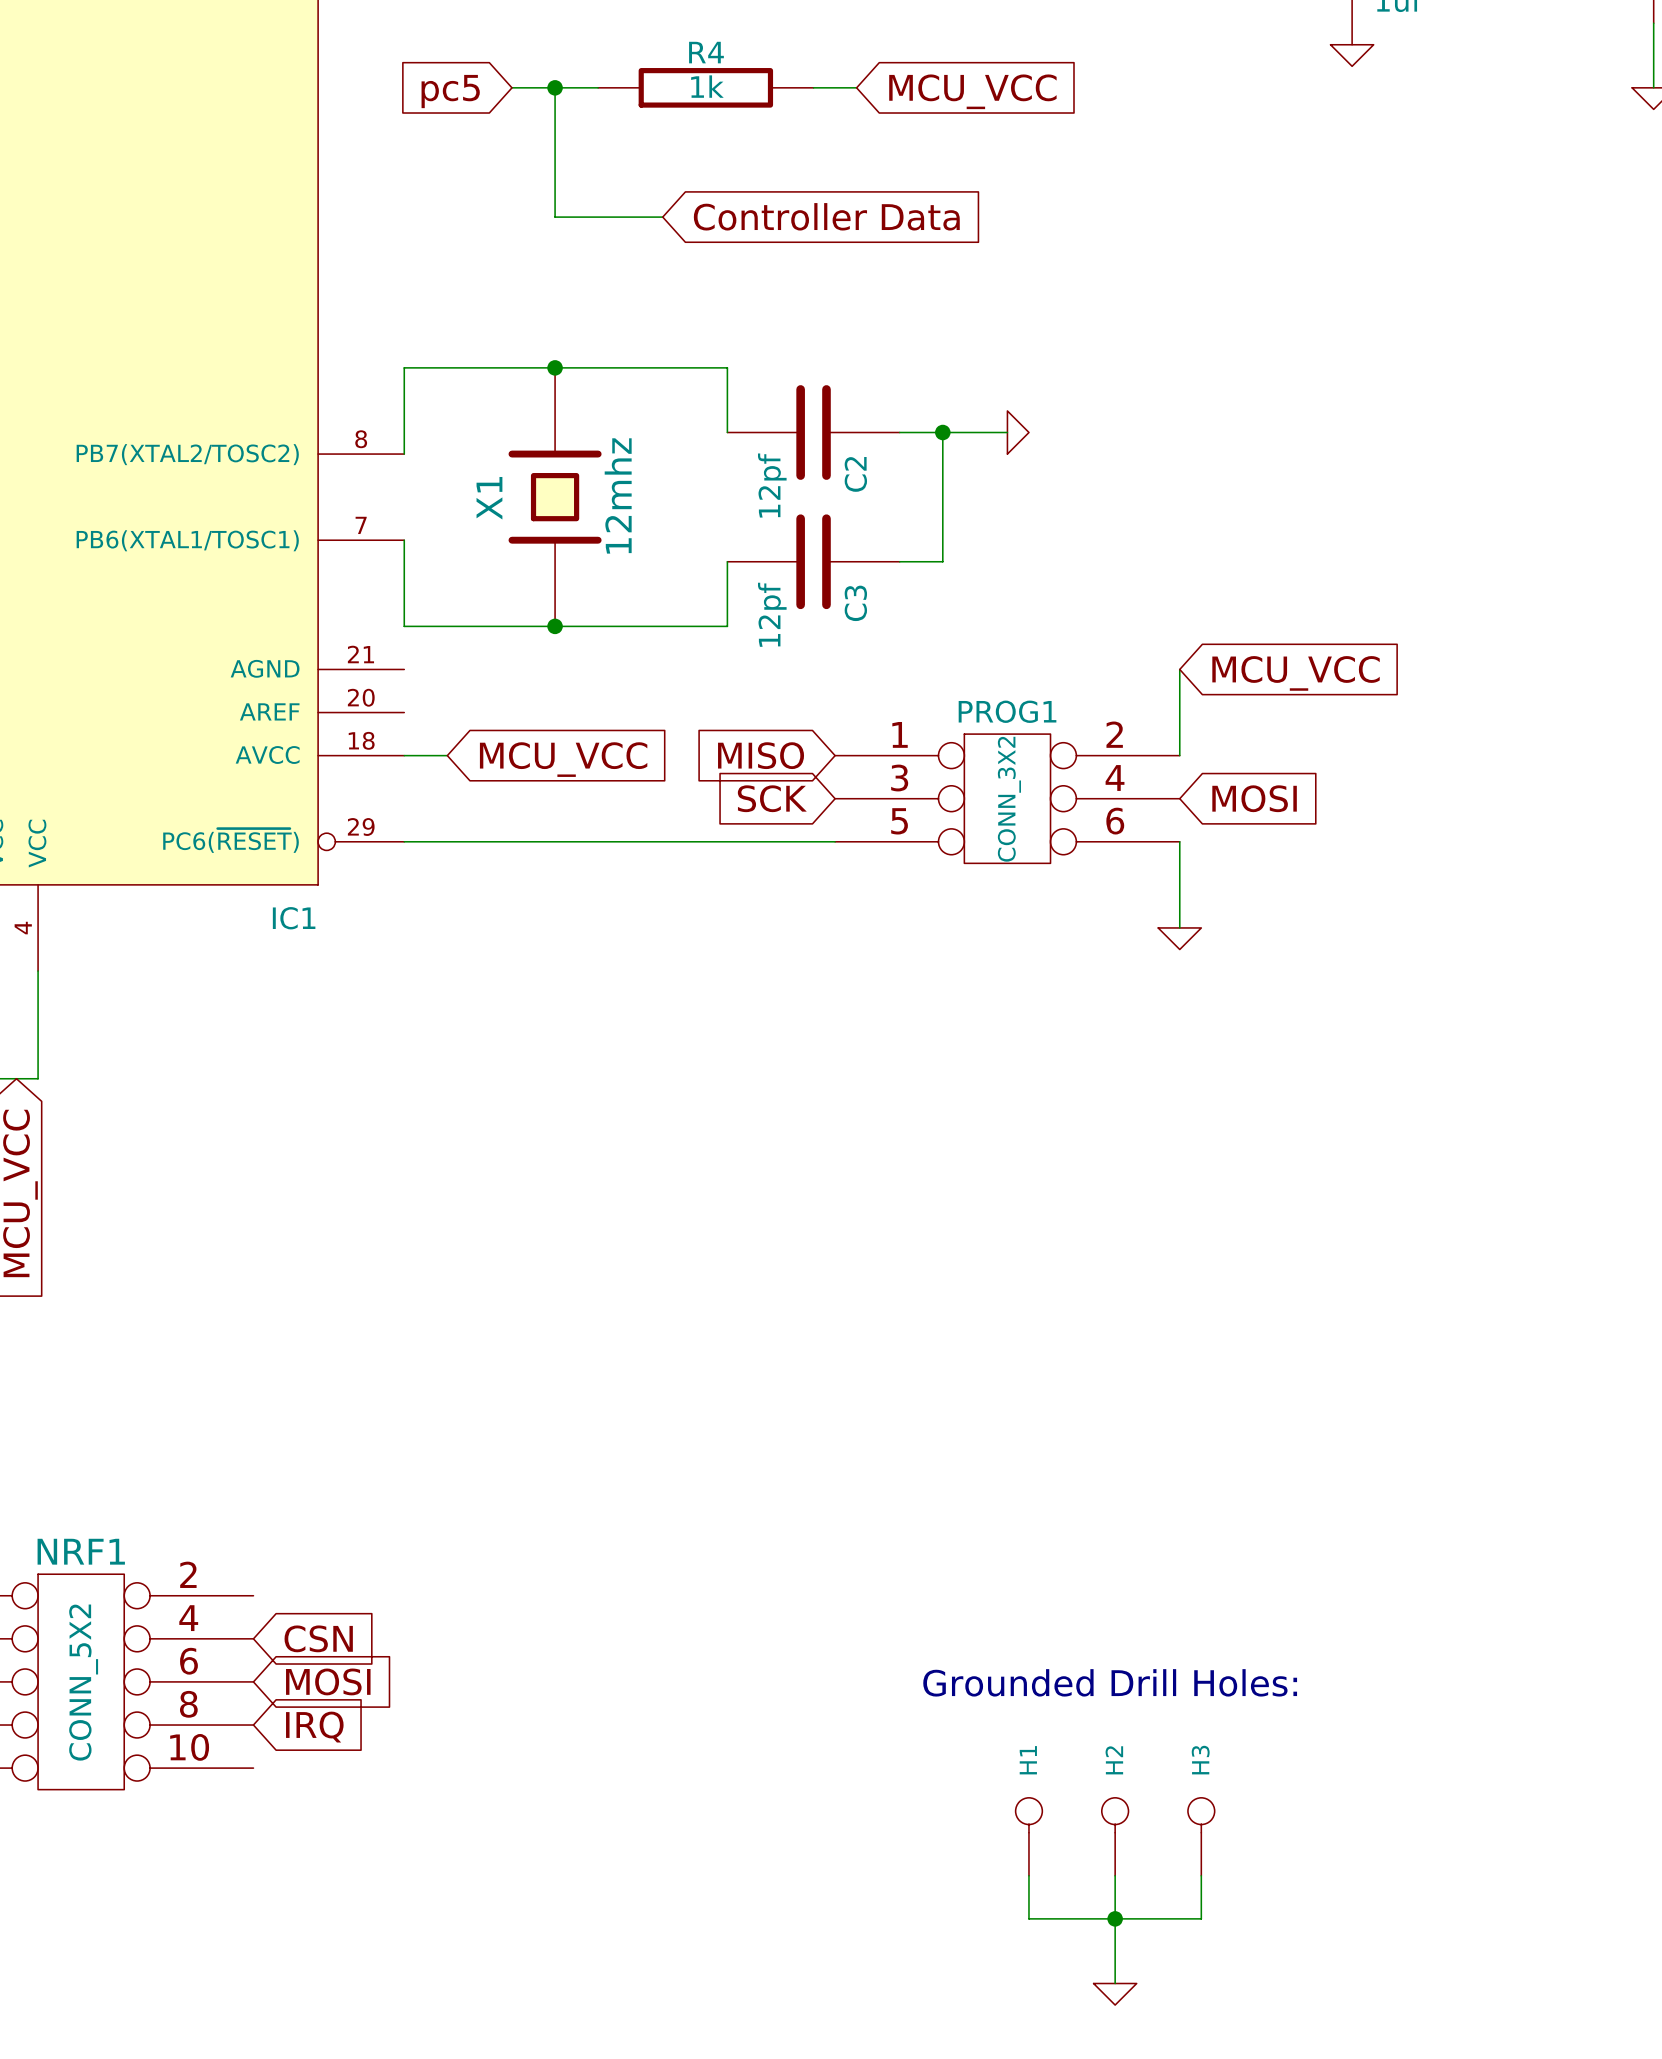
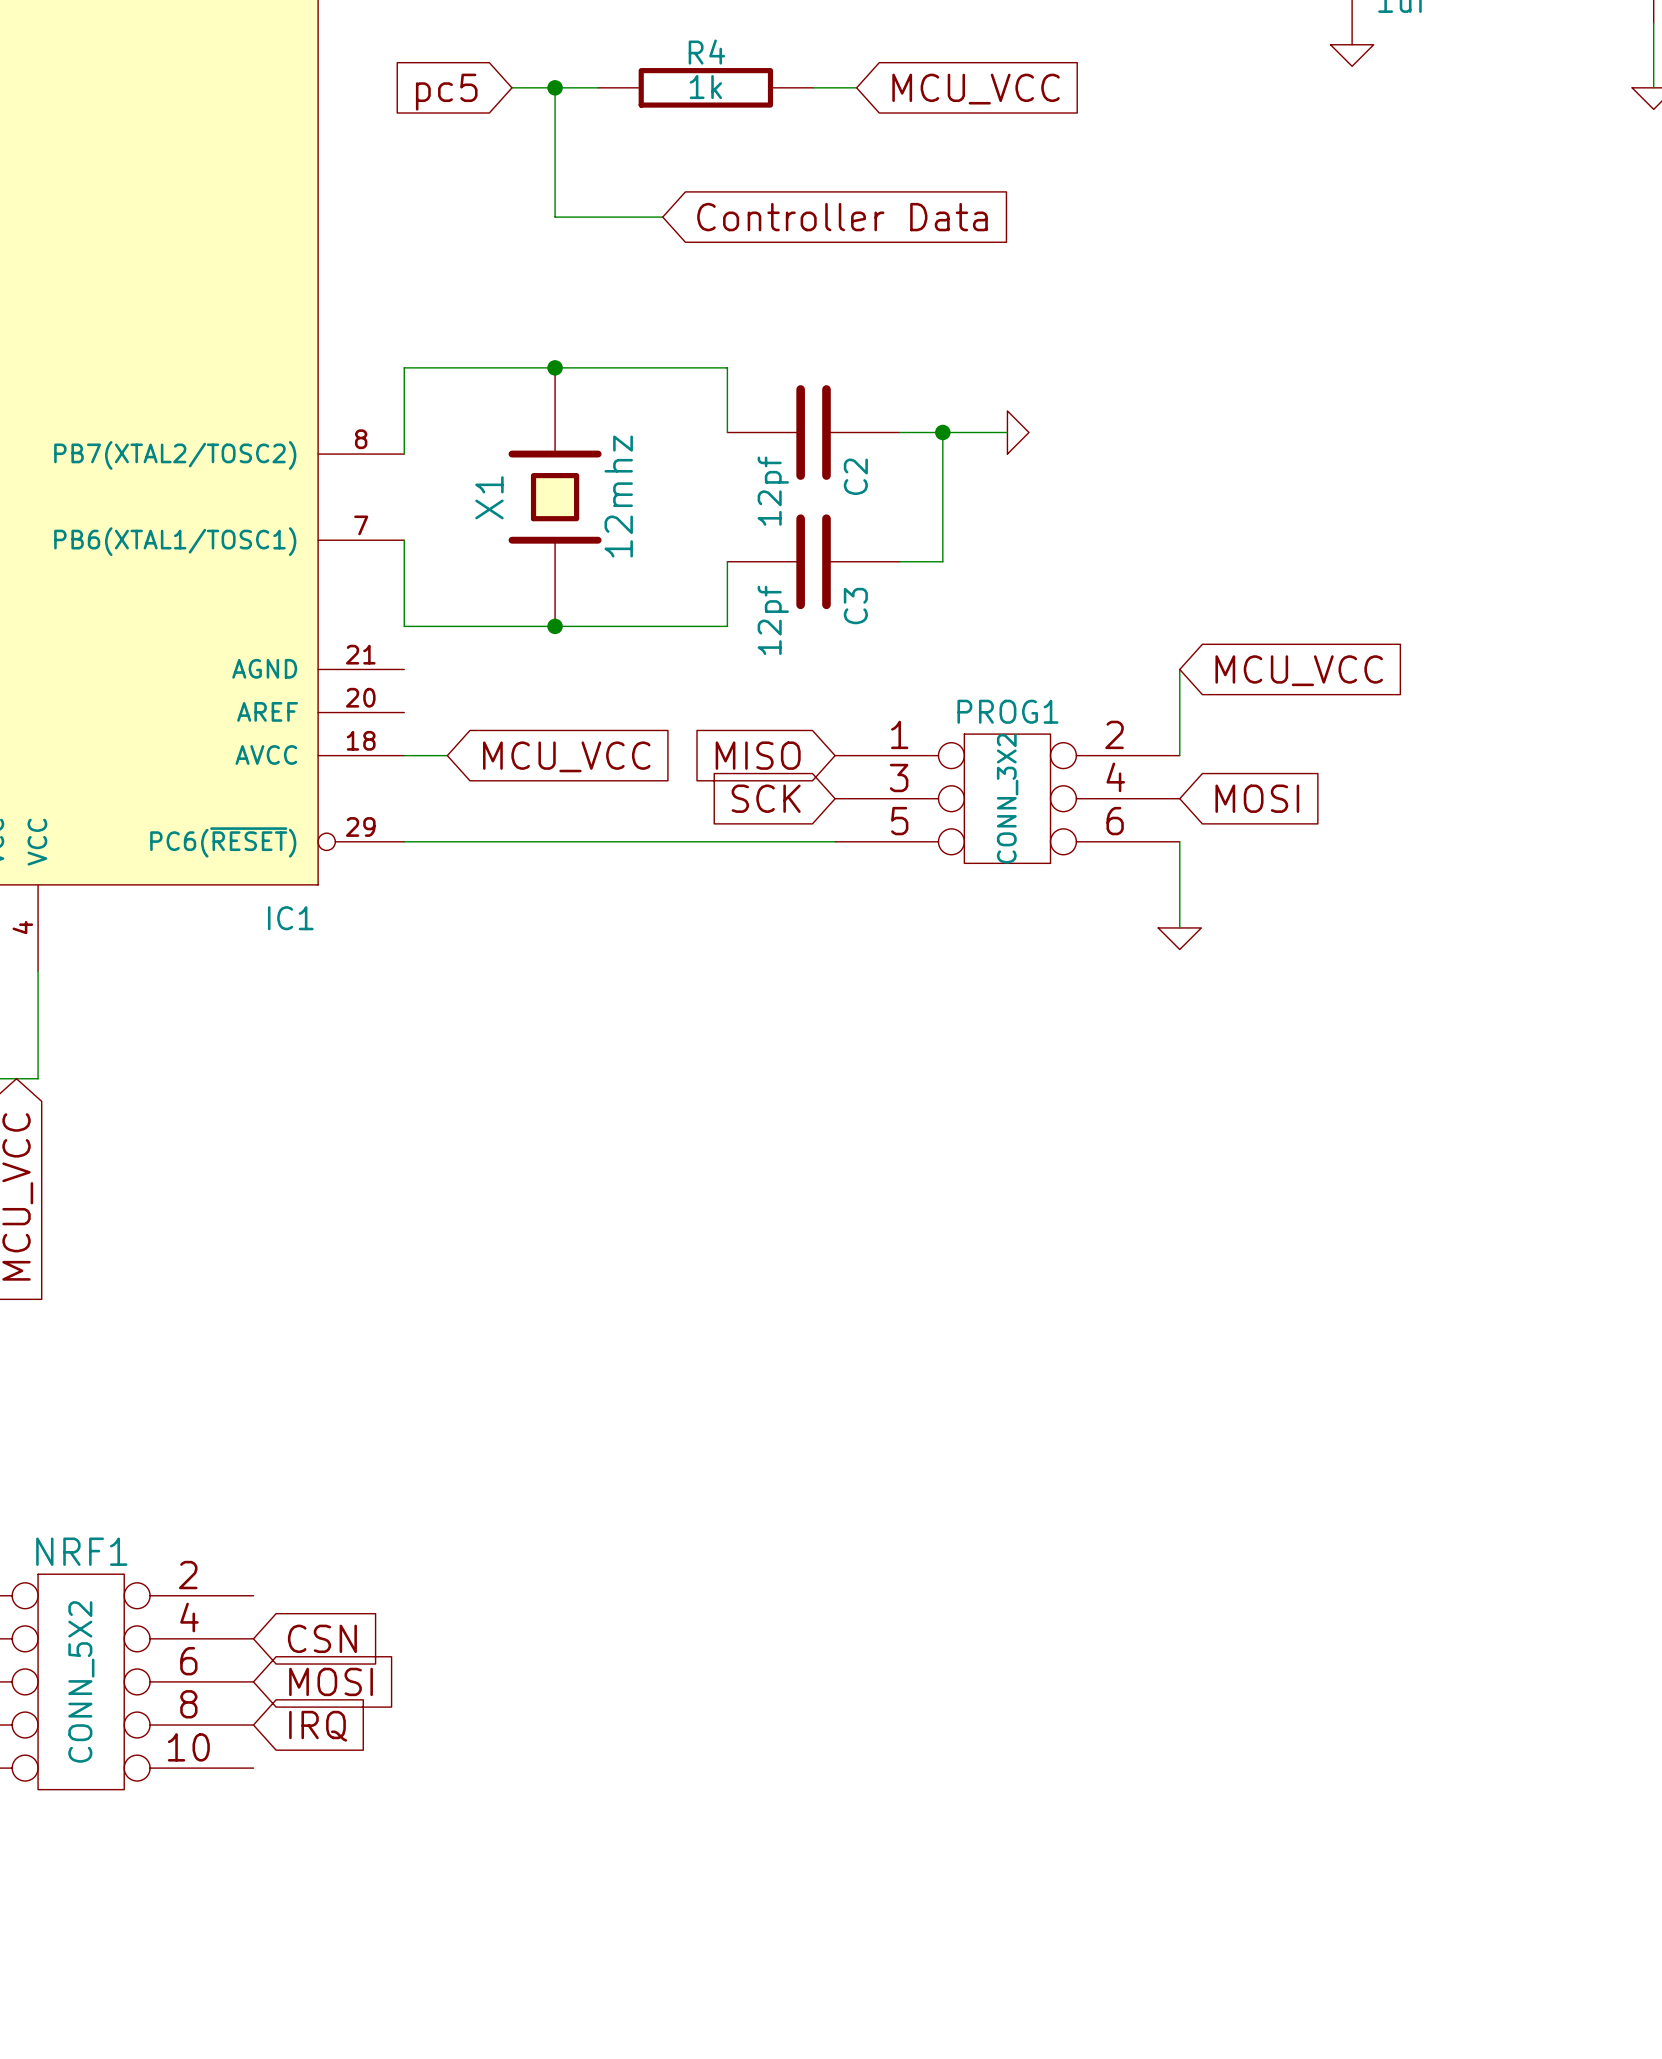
text: Grounded Drill Holes: (1110, 1682) -> none
H1: (1028, 1836) -> none
H2: (1115, 1836) -> none
H3: (1201, 1836) -> none
wire: (1028, 1875) (1028, 1918) (1201, 1918) (1201, 1875) -> none
wire: (1115, 1875) (1115, 1983) -> none
junction: (1115, 1918) -> none
power symbol: (1115, 1994) -> none

